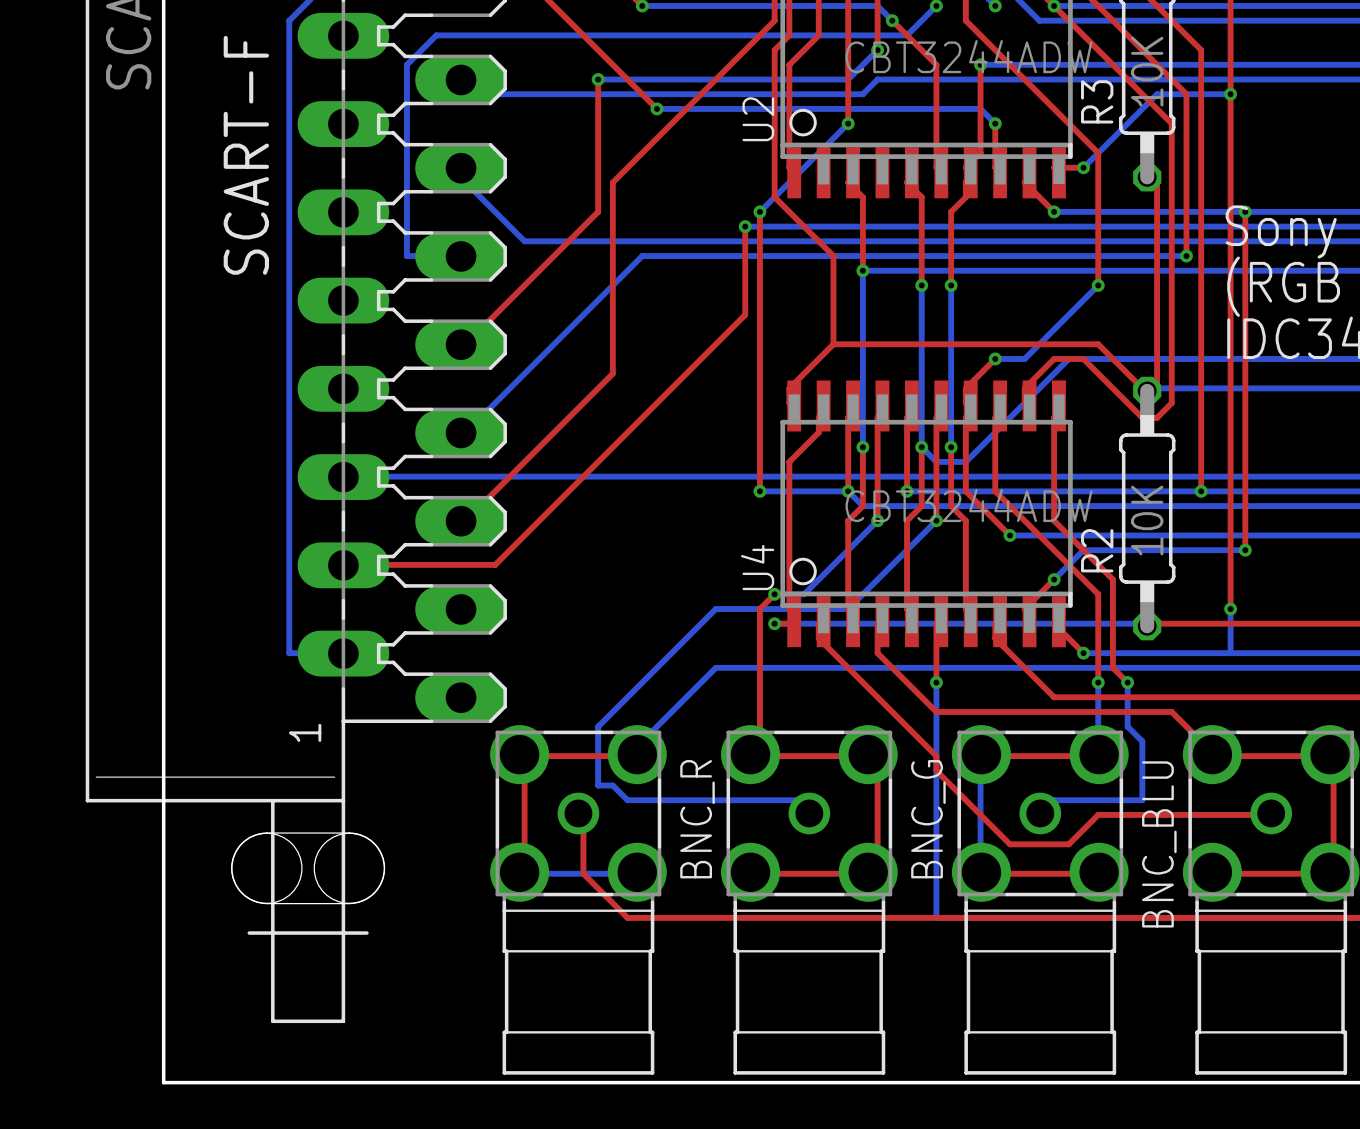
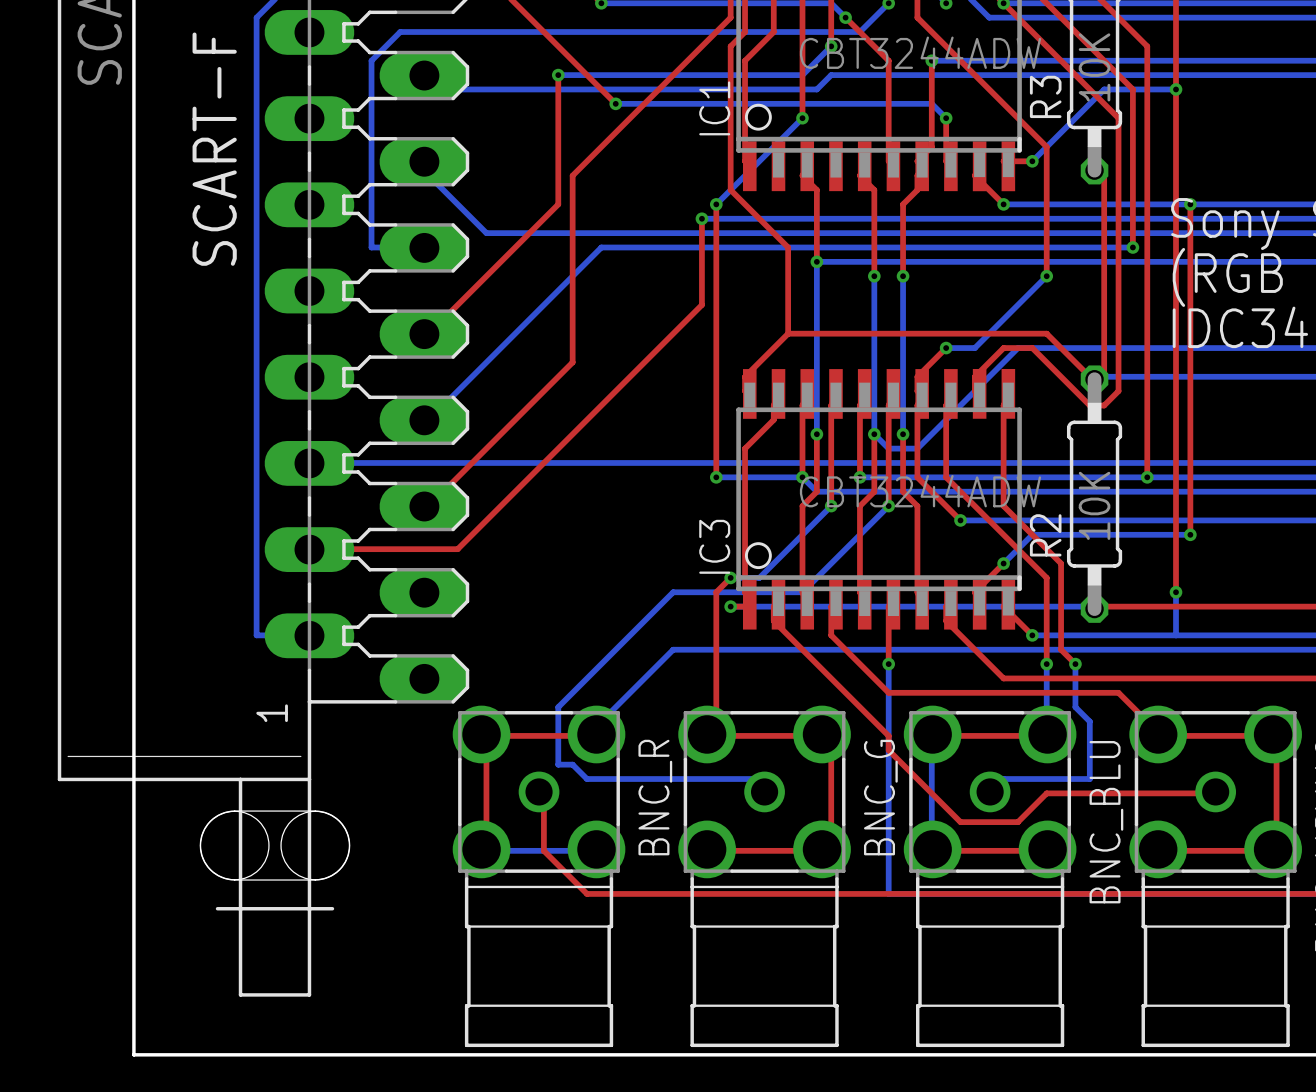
U2 name: U2 (758, 119) -> IC1 (714, 108)
U4 name: U4 (757, 567) -> IC3 (714, 546)

